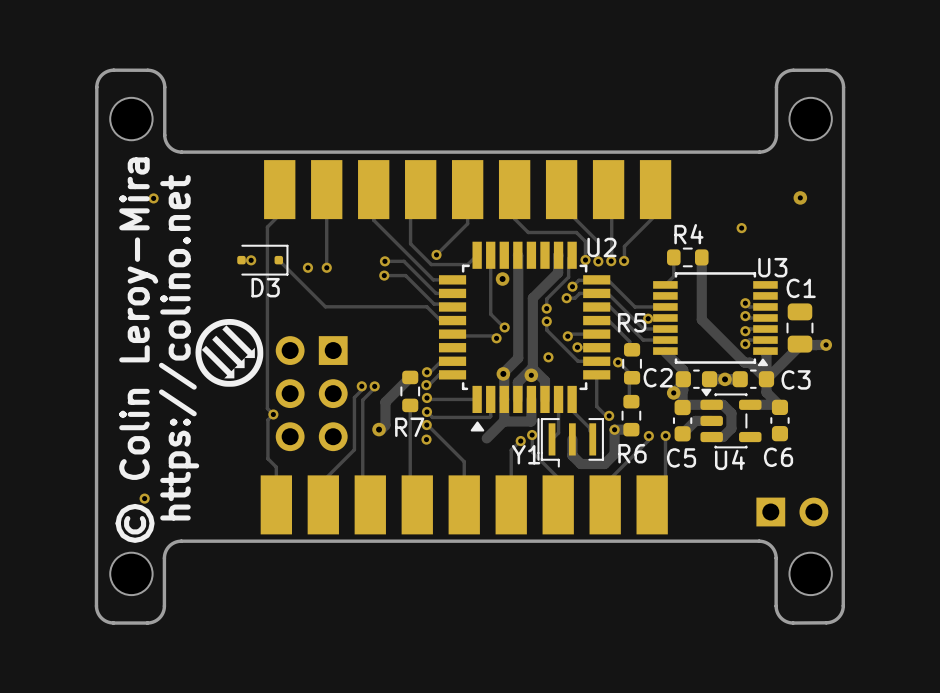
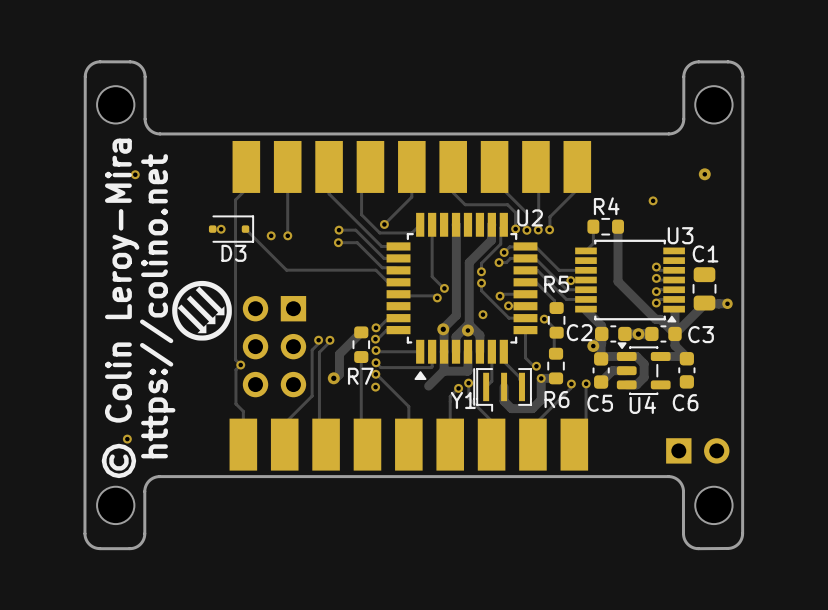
via: (502, 279) -> none

